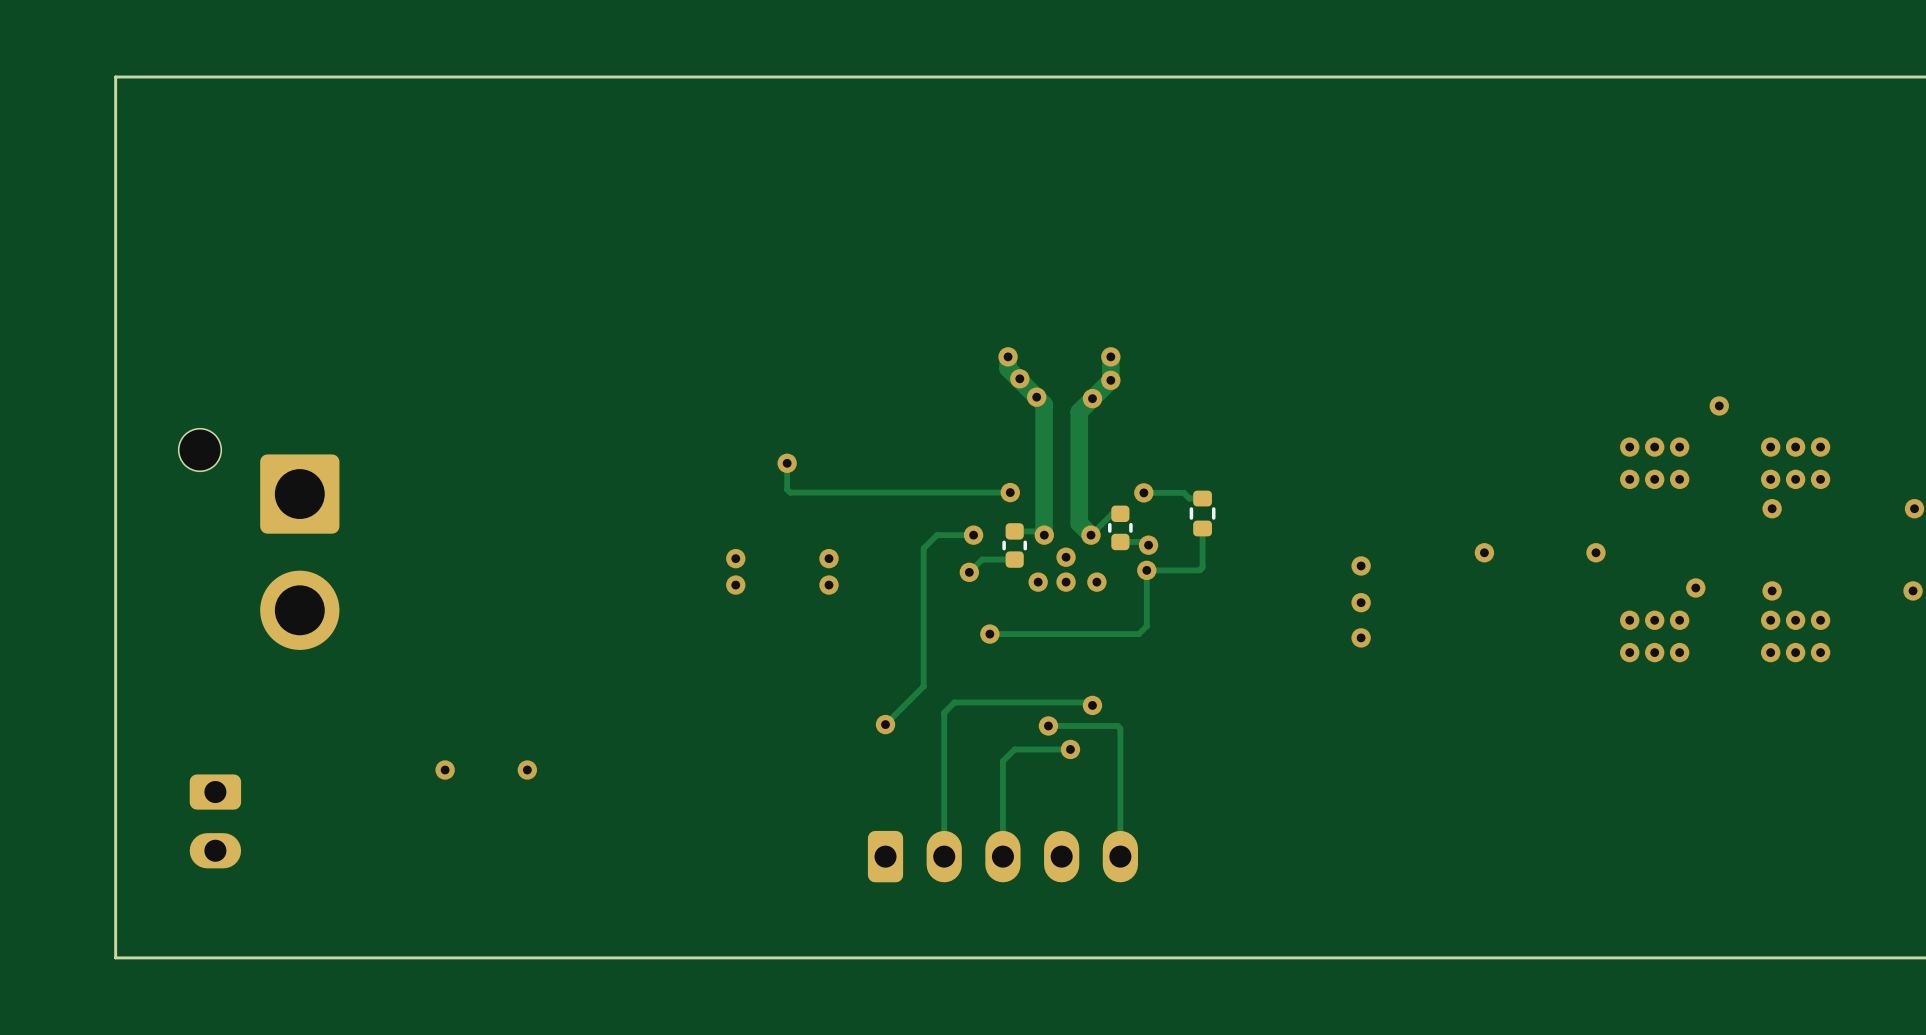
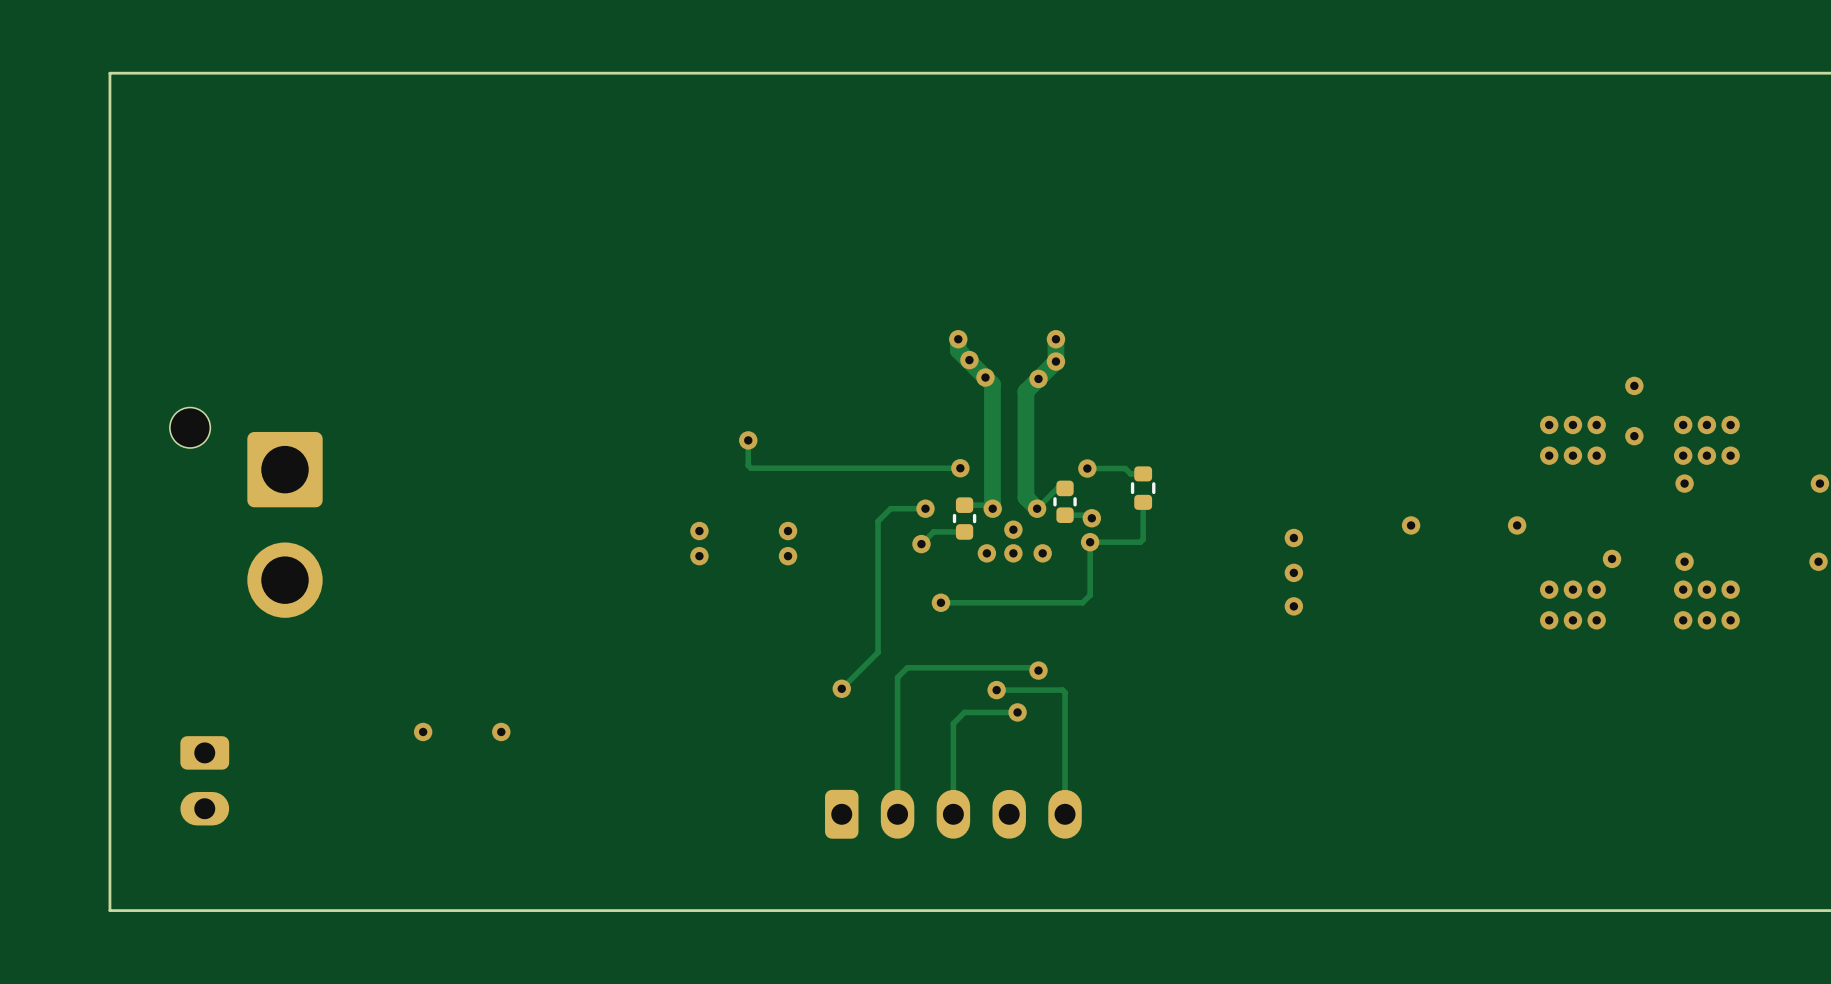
via: none -> (1634, 436)

